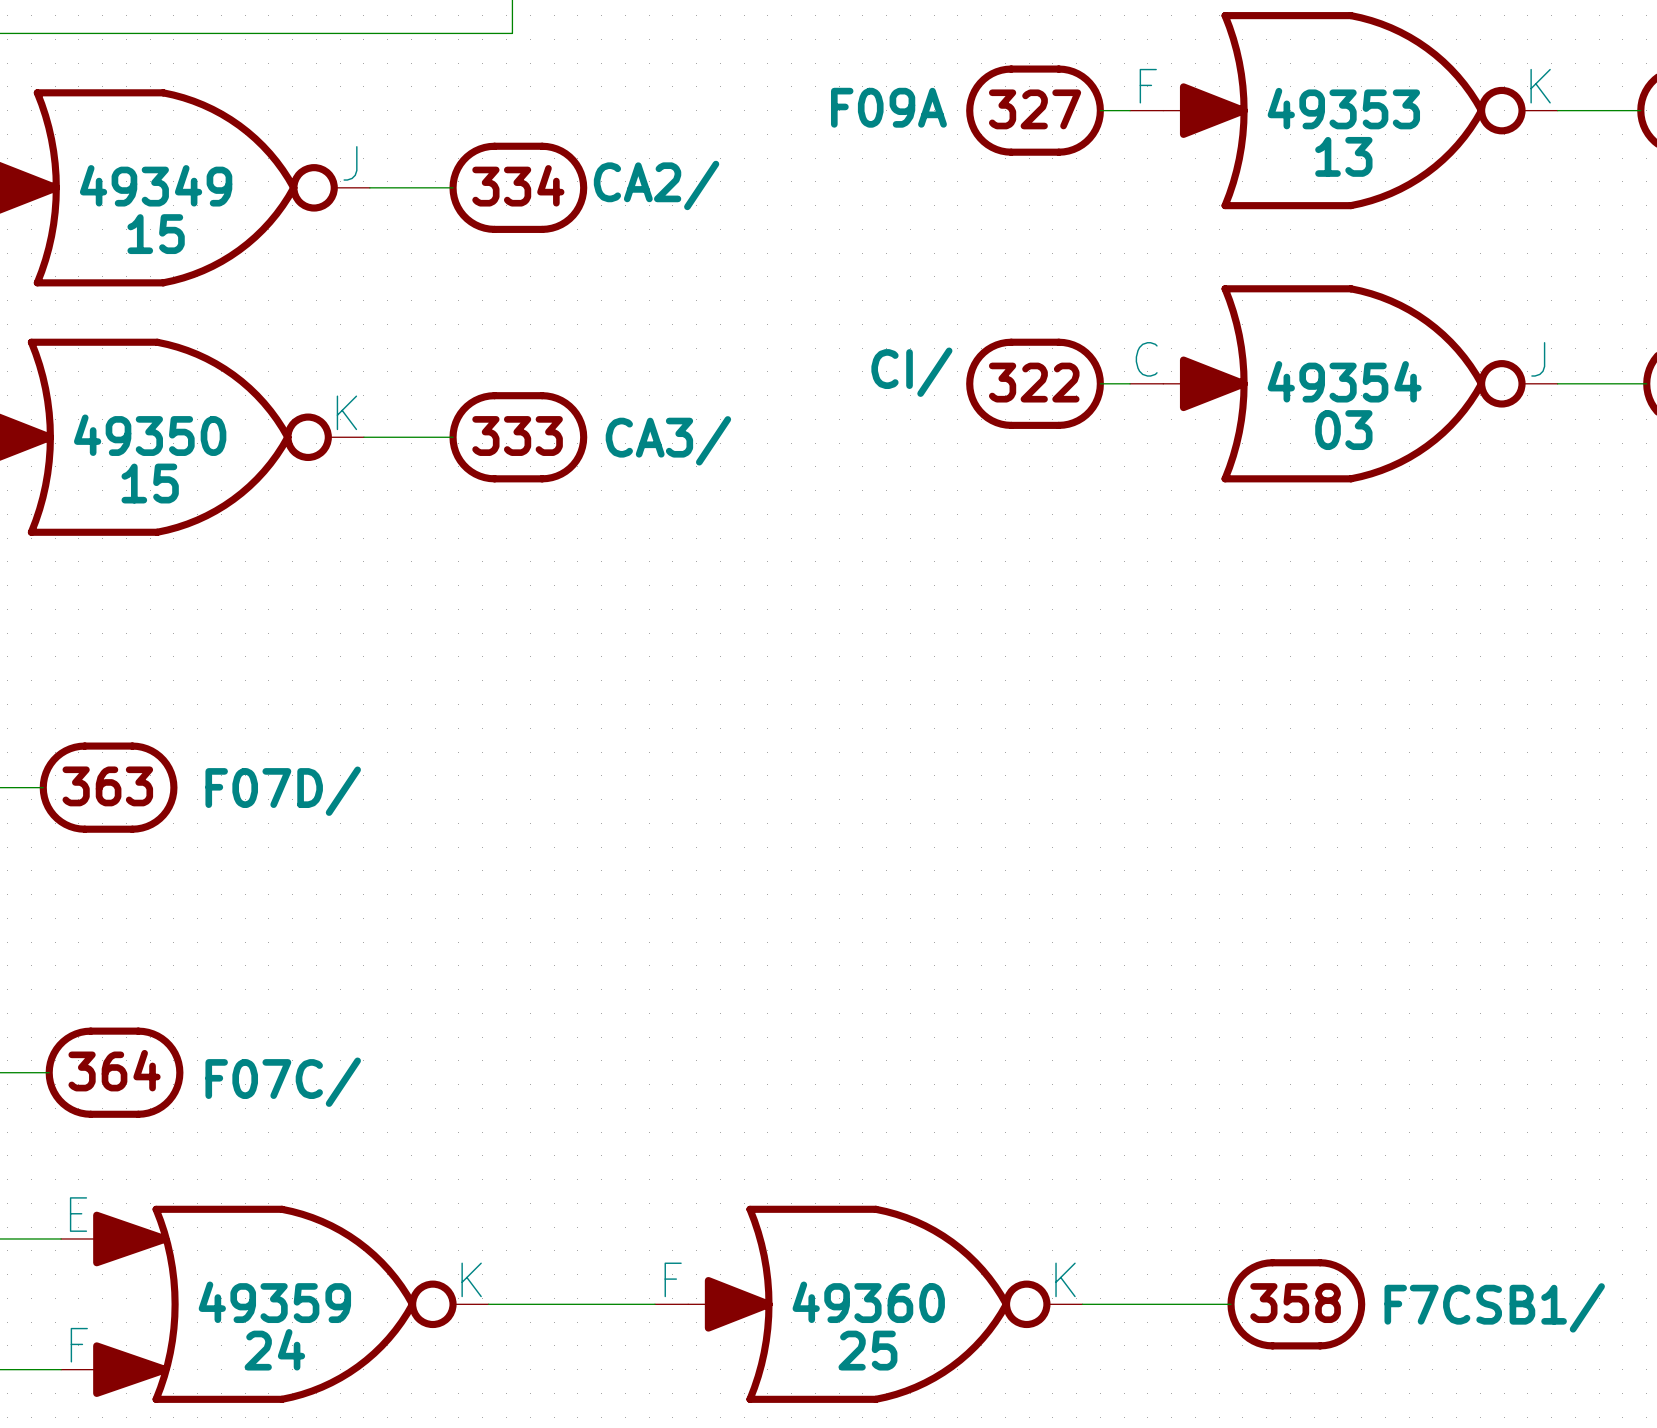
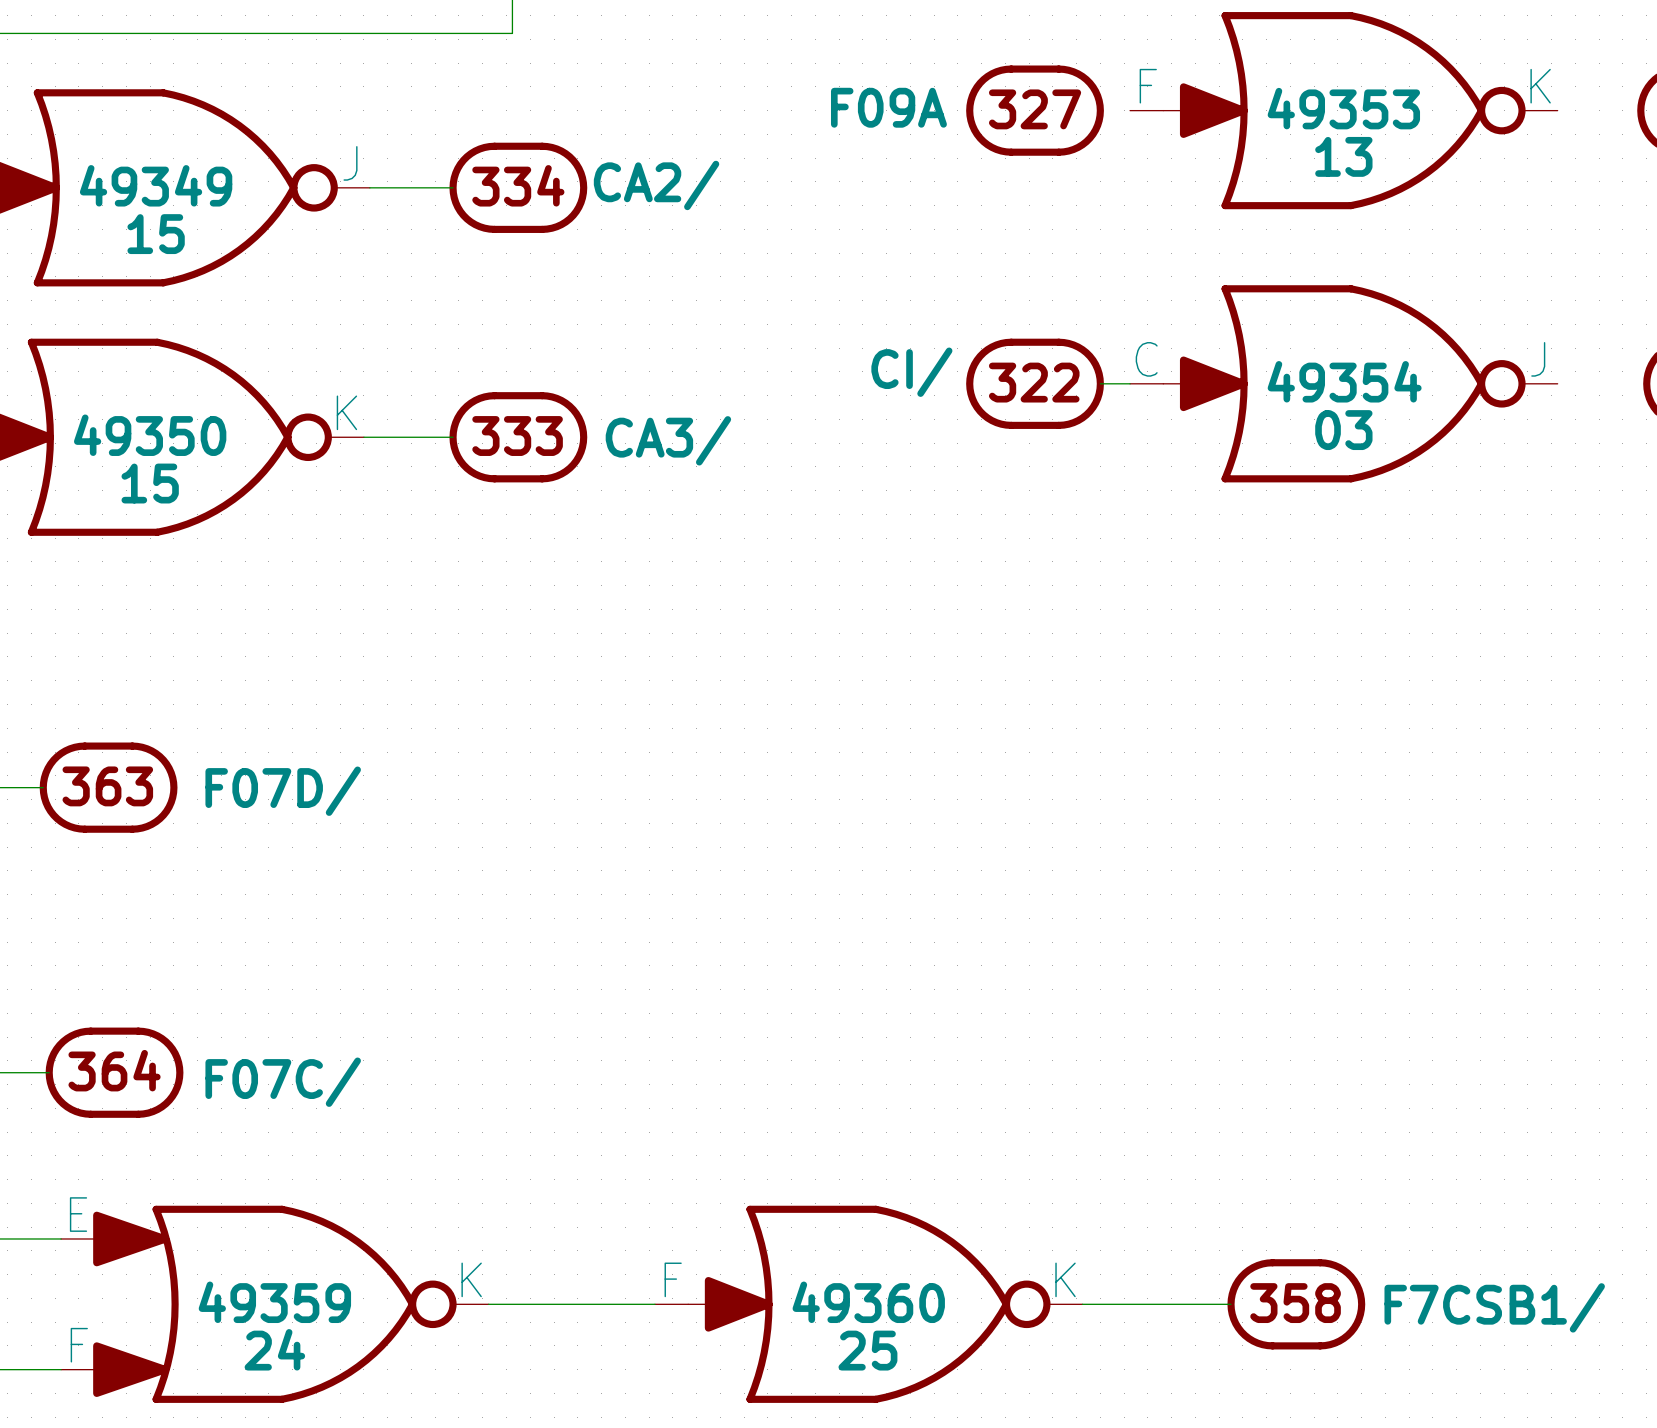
wire: (1100, 110) (1130, 110) -> none
wire: (1557, 110) (1640, 110) -> none
wire: (1557, 383) (1646, 383) -> none

